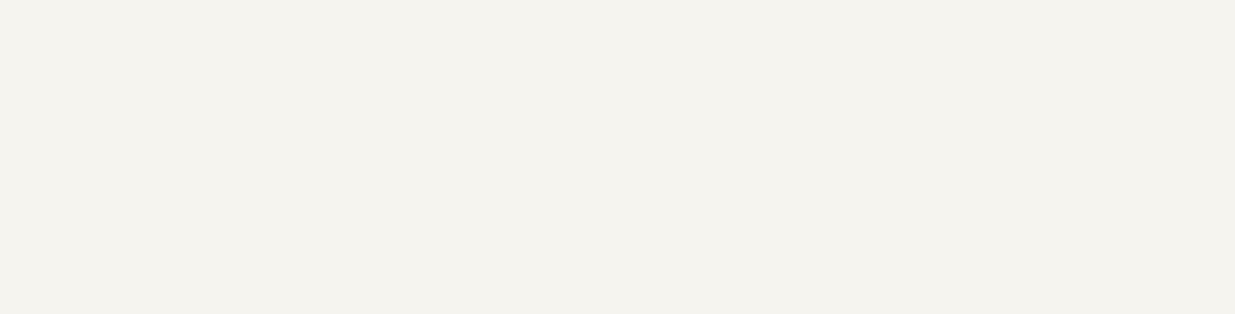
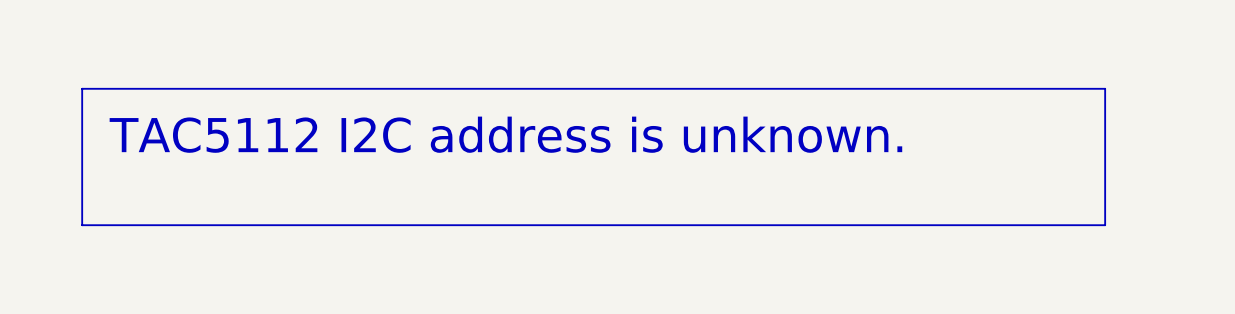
line: none -> (82, 88) (1105, 88) (1105, 225) (82, 225) (82, 88)
text: none -> TAC5112 I2C address is unknown. (505, 134)

